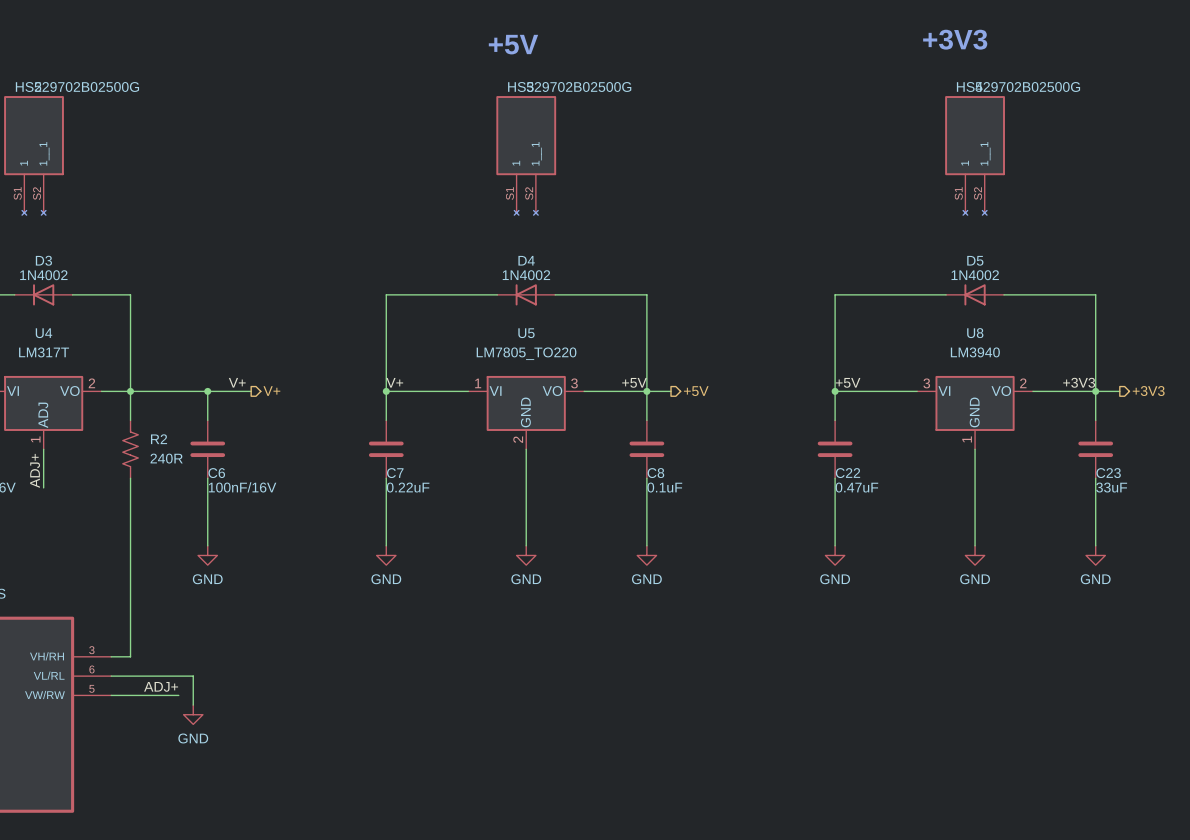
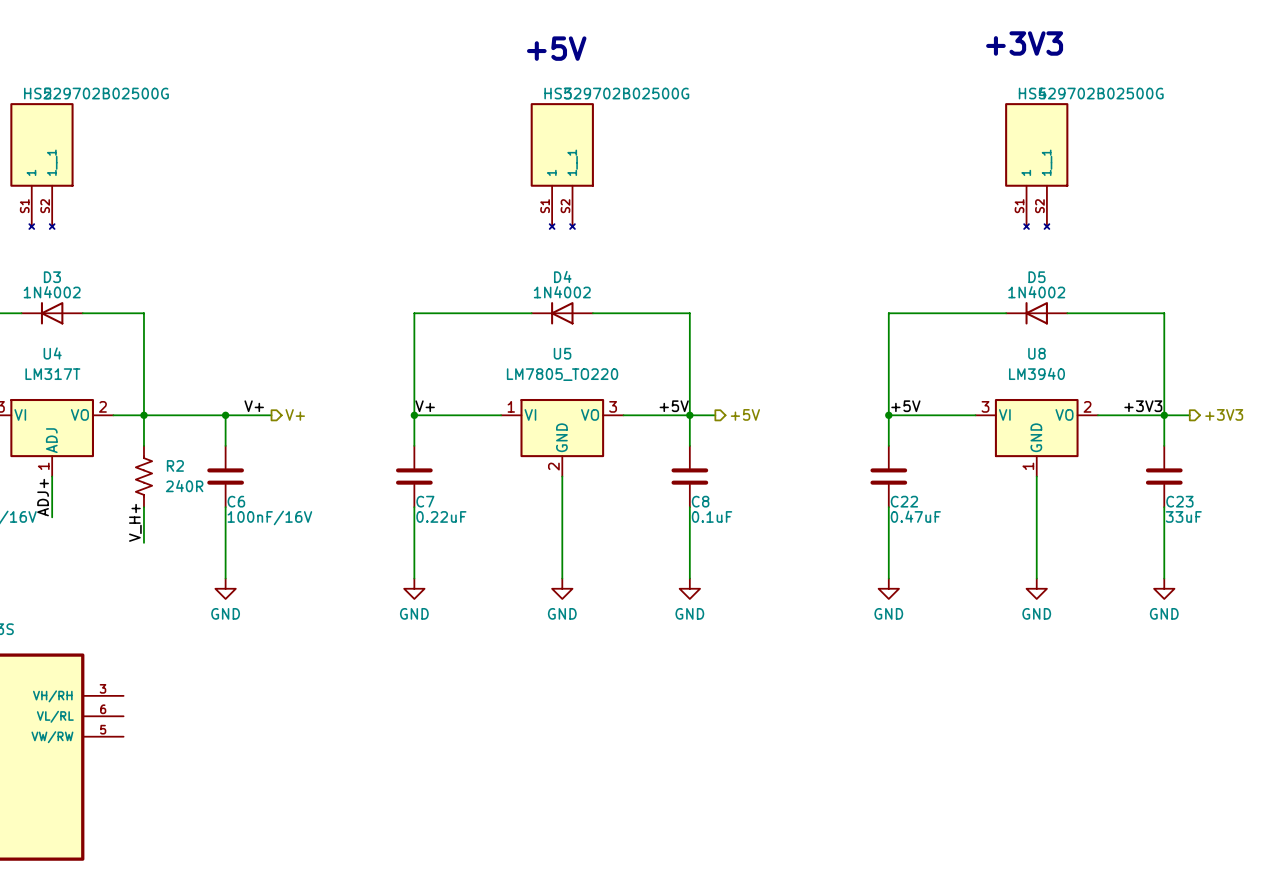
label: none -> V_H+ (135, 522)
wire: (130, 512) (130, 656) (111, 656) -> none
wire: (111, 676) (193, 676) (193, 705) -> none
label: ADJ+ (161, 686) -> none
wire: (111, 695) (178, 695) -> none
power symbol: GND (193, 714) -> none

